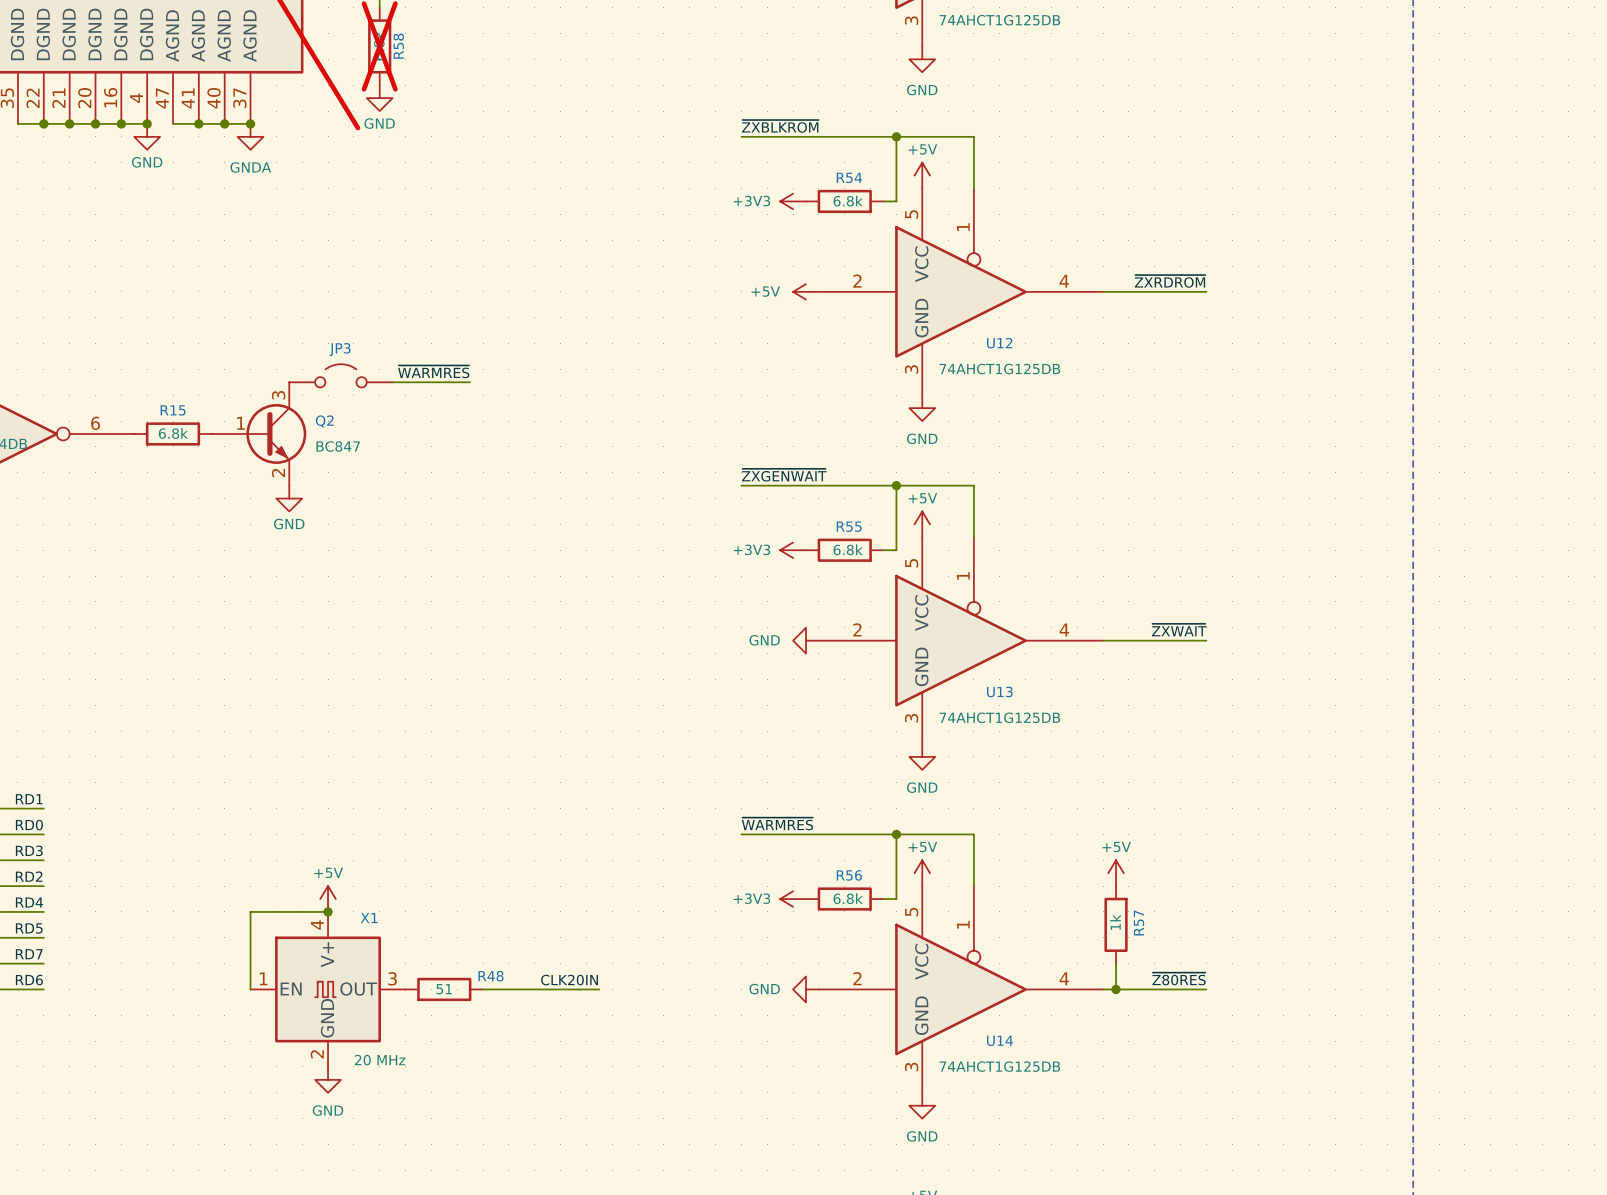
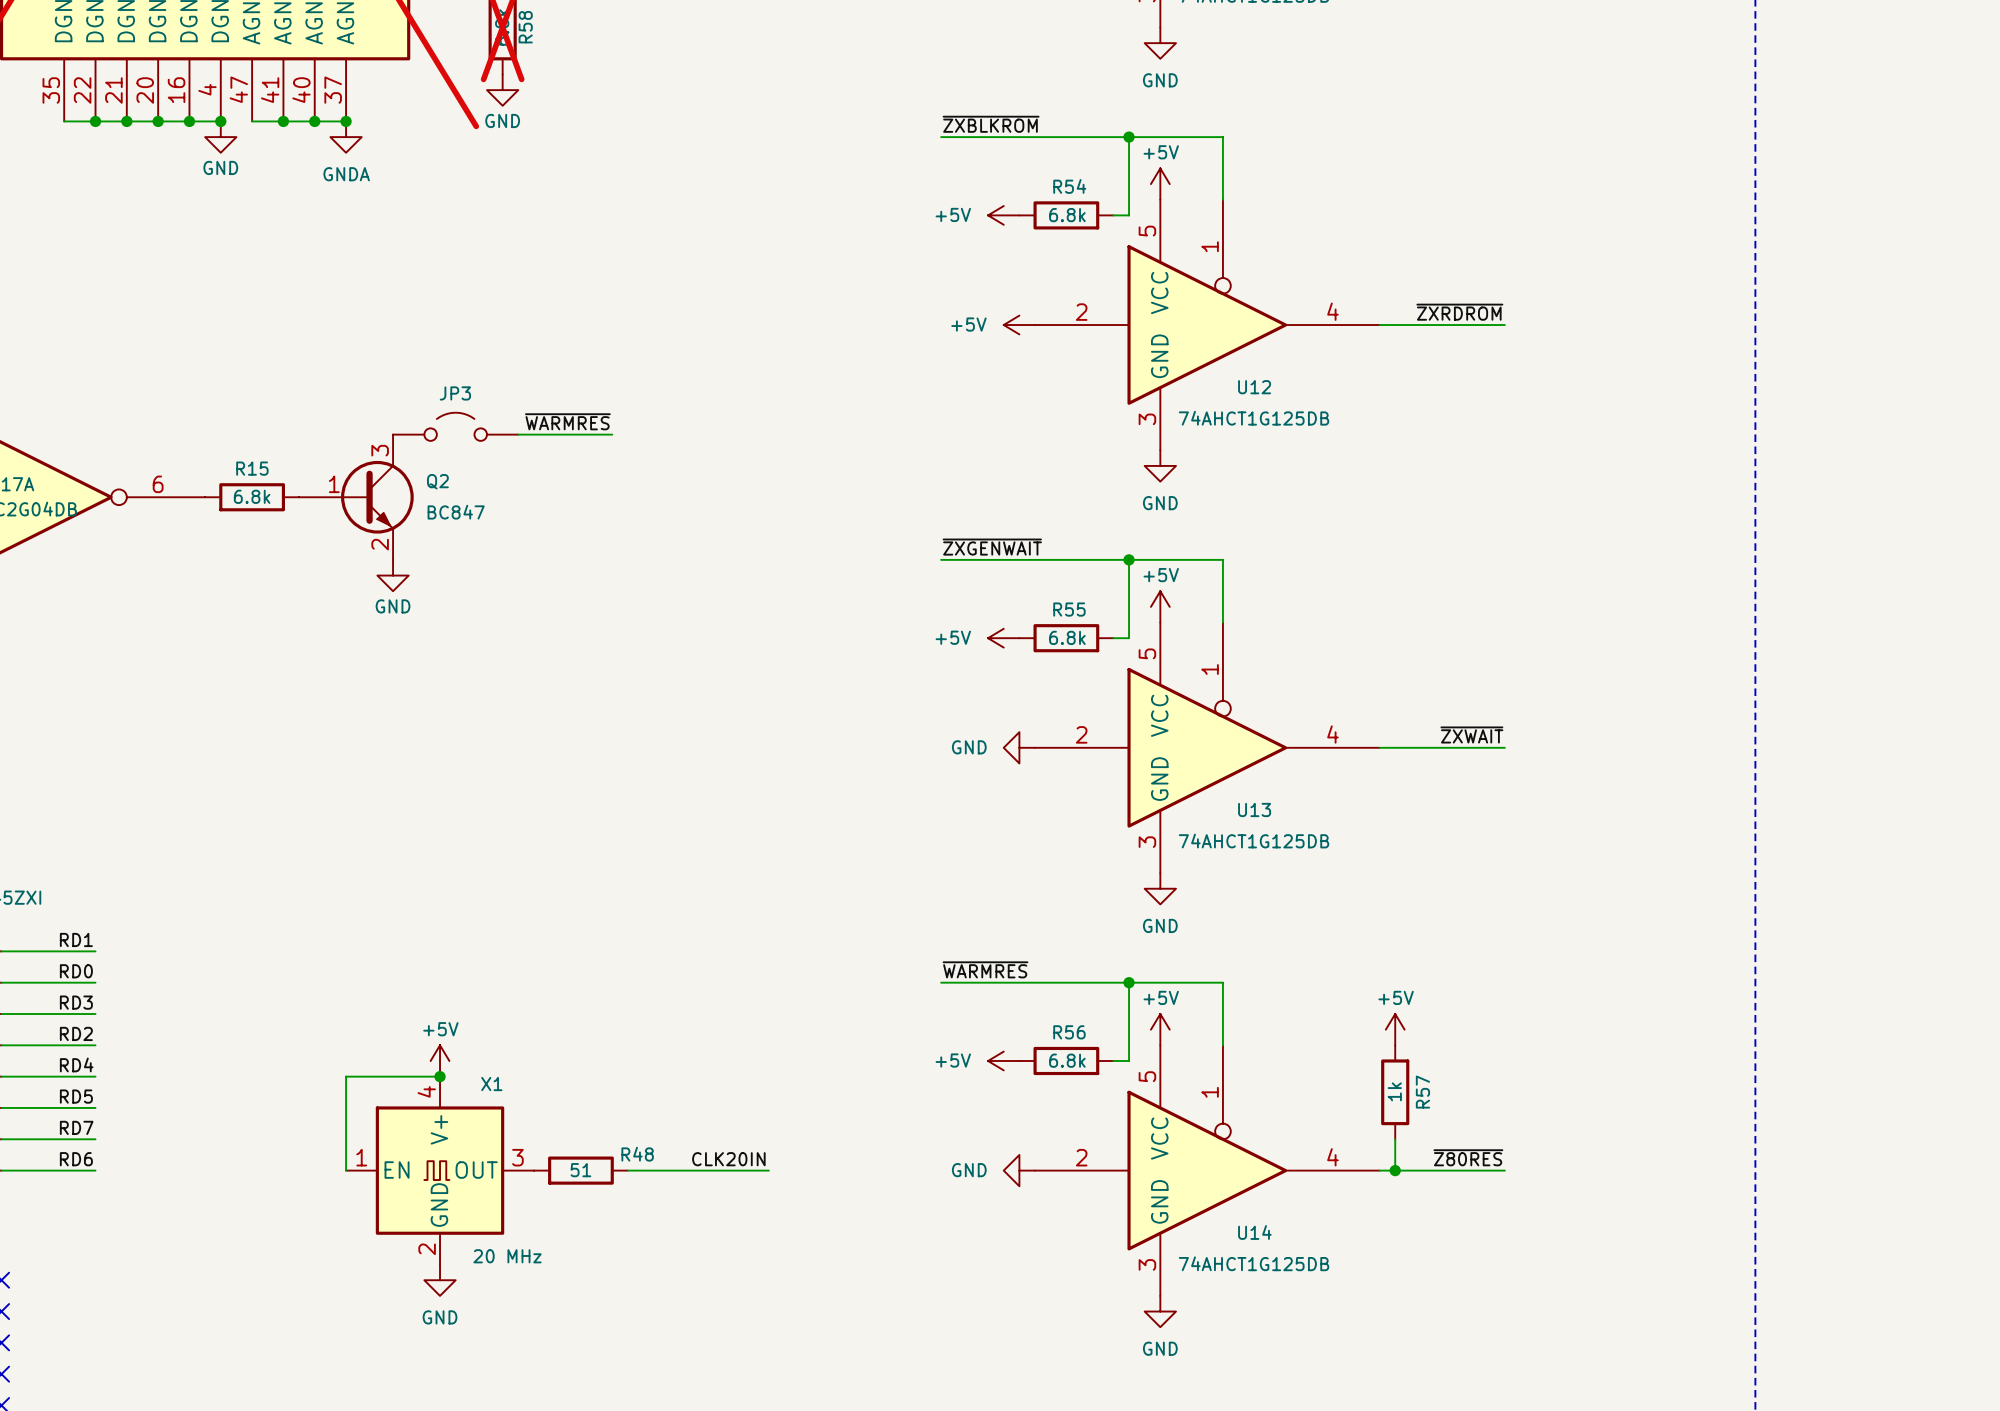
power symbol: +3V3 (793, 201) -> +5V (1003, 215)
power symbol: +3V3 (793, 550) -> +5V (1003, 638)
power symbol: +3V3 (793, 899) -> +5V (1003, 1060)

